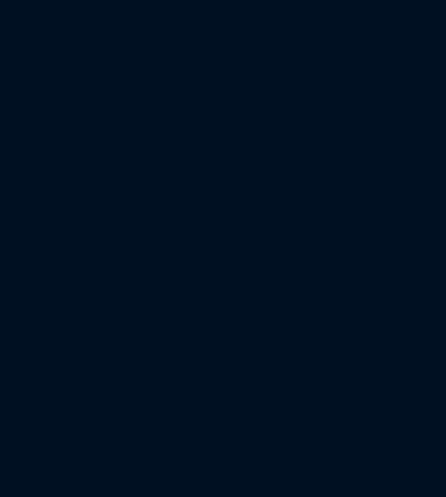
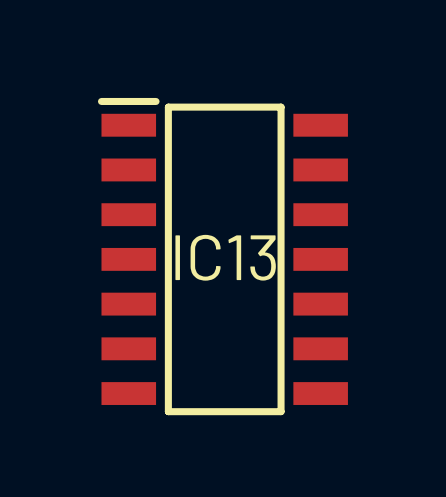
IC13: none -> (222, 256)

